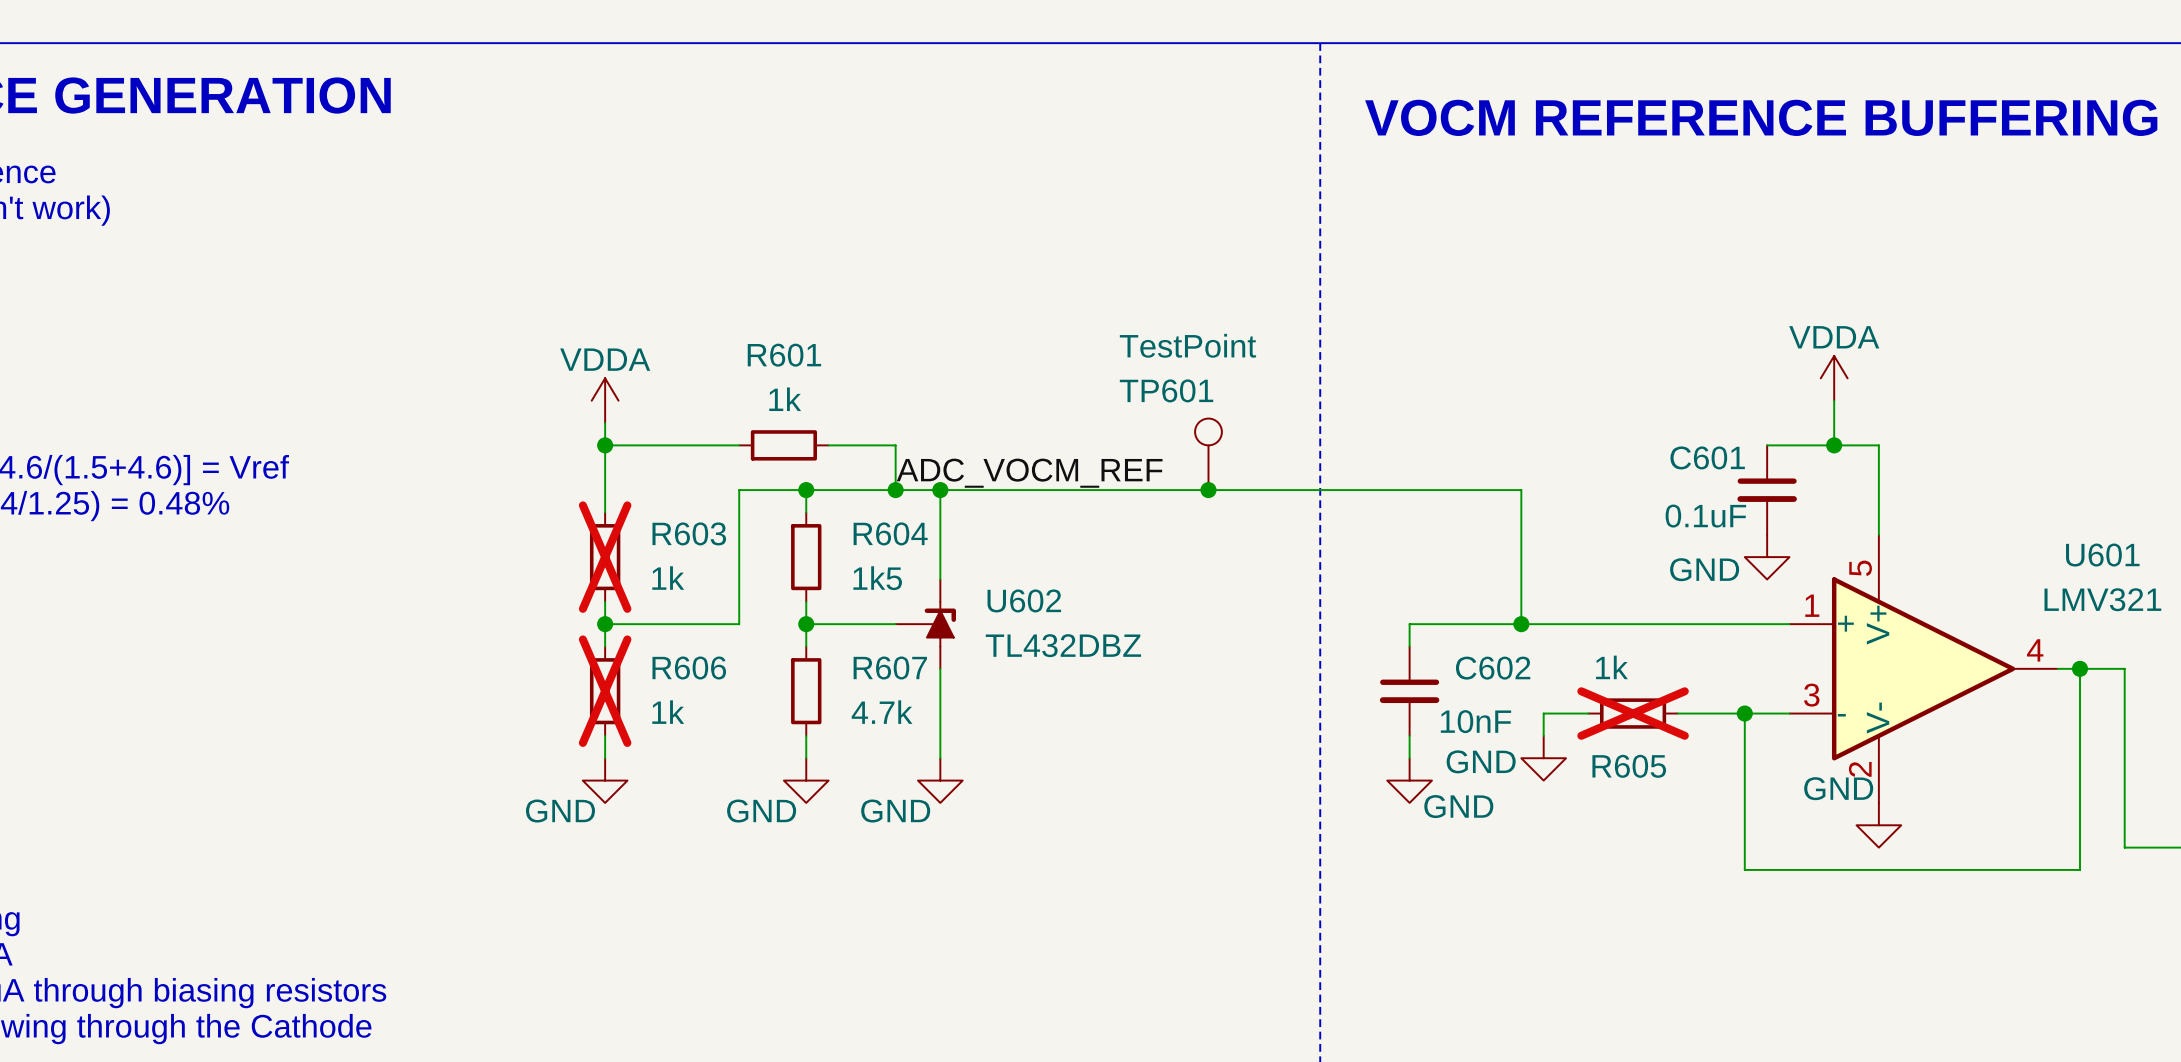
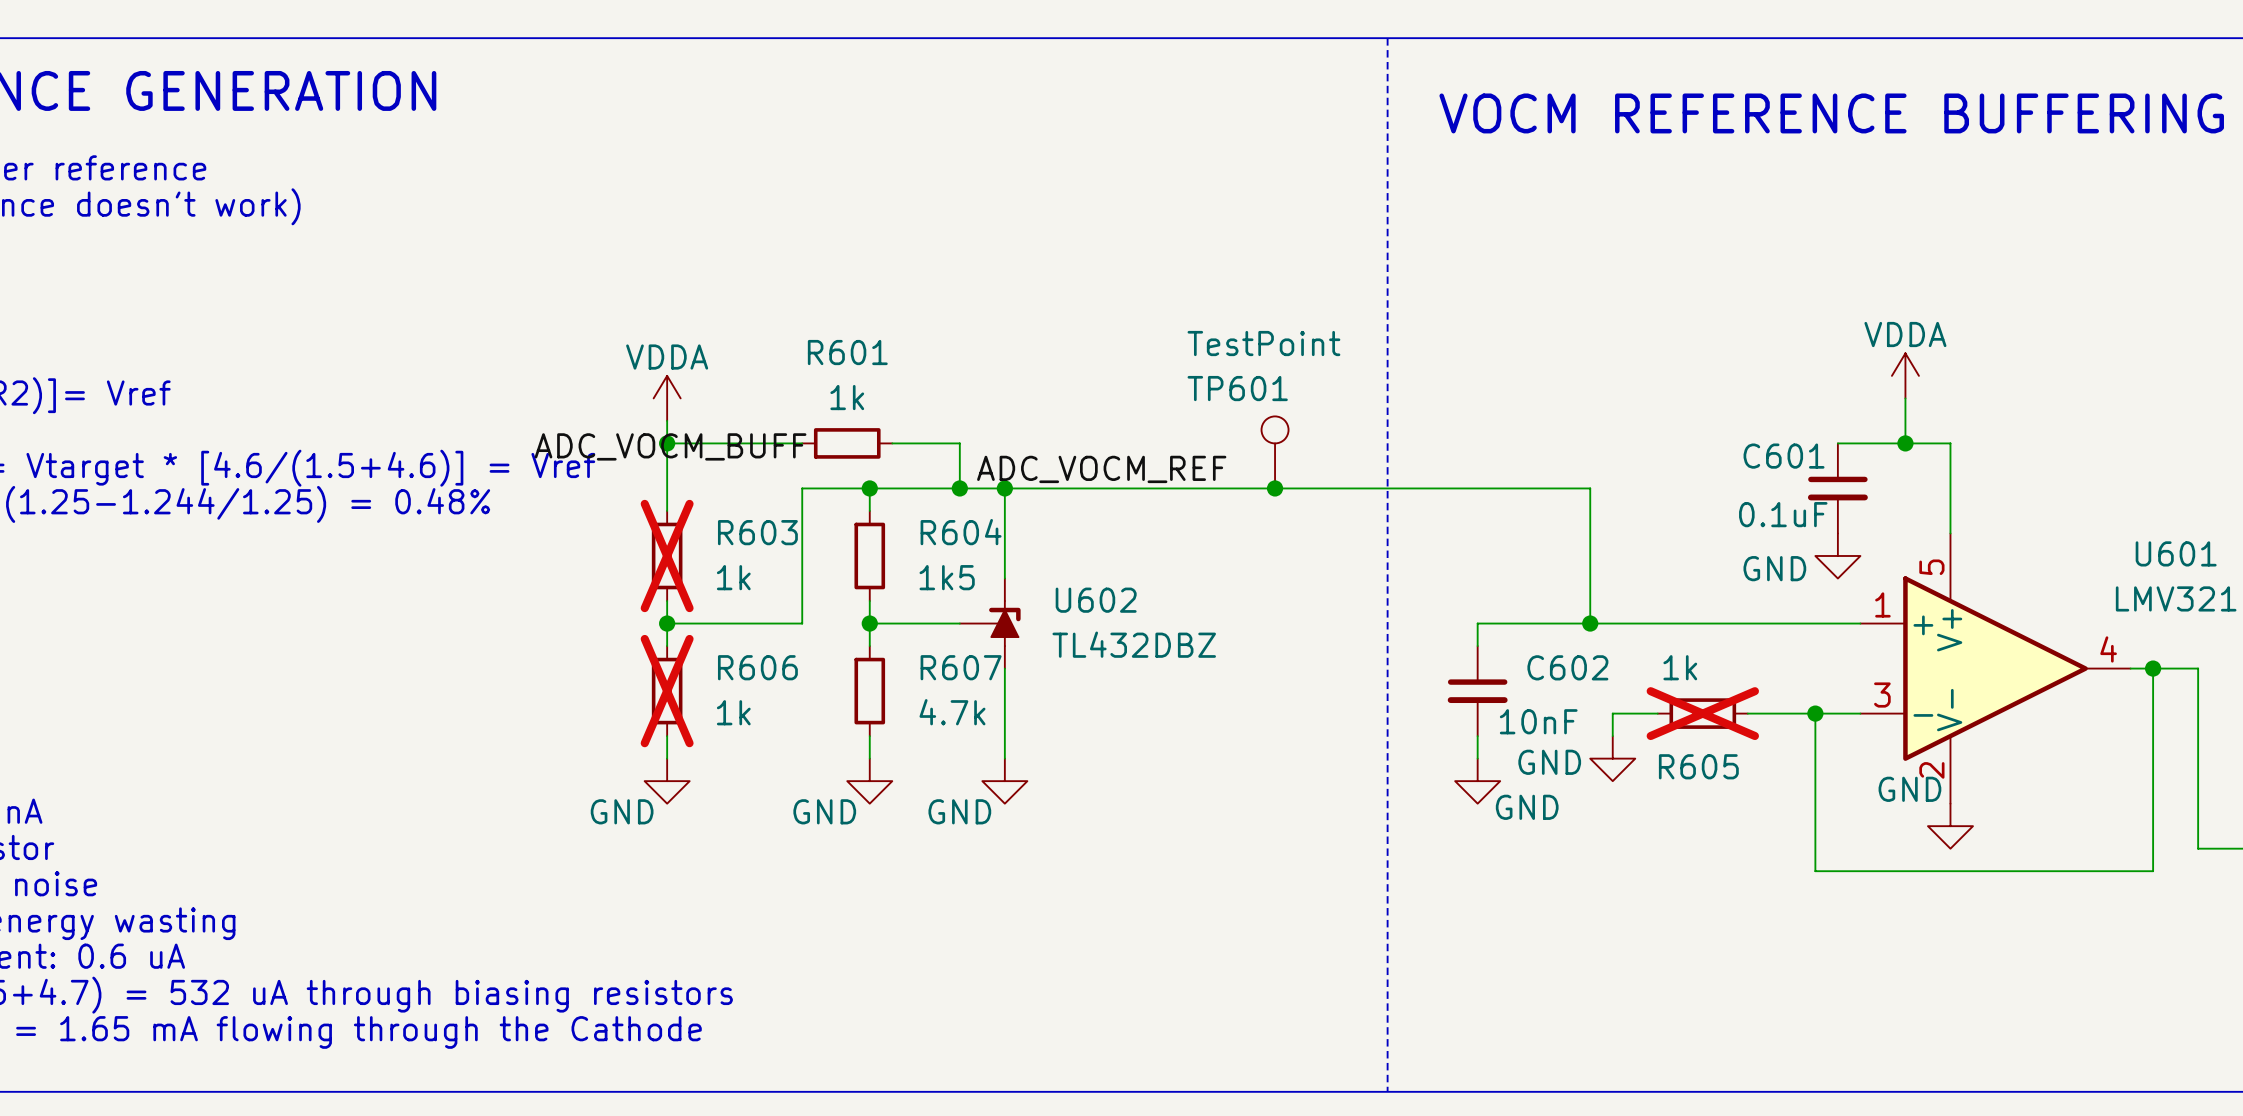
label: none -> ADC_VOCM_BUFF (670, 446)

